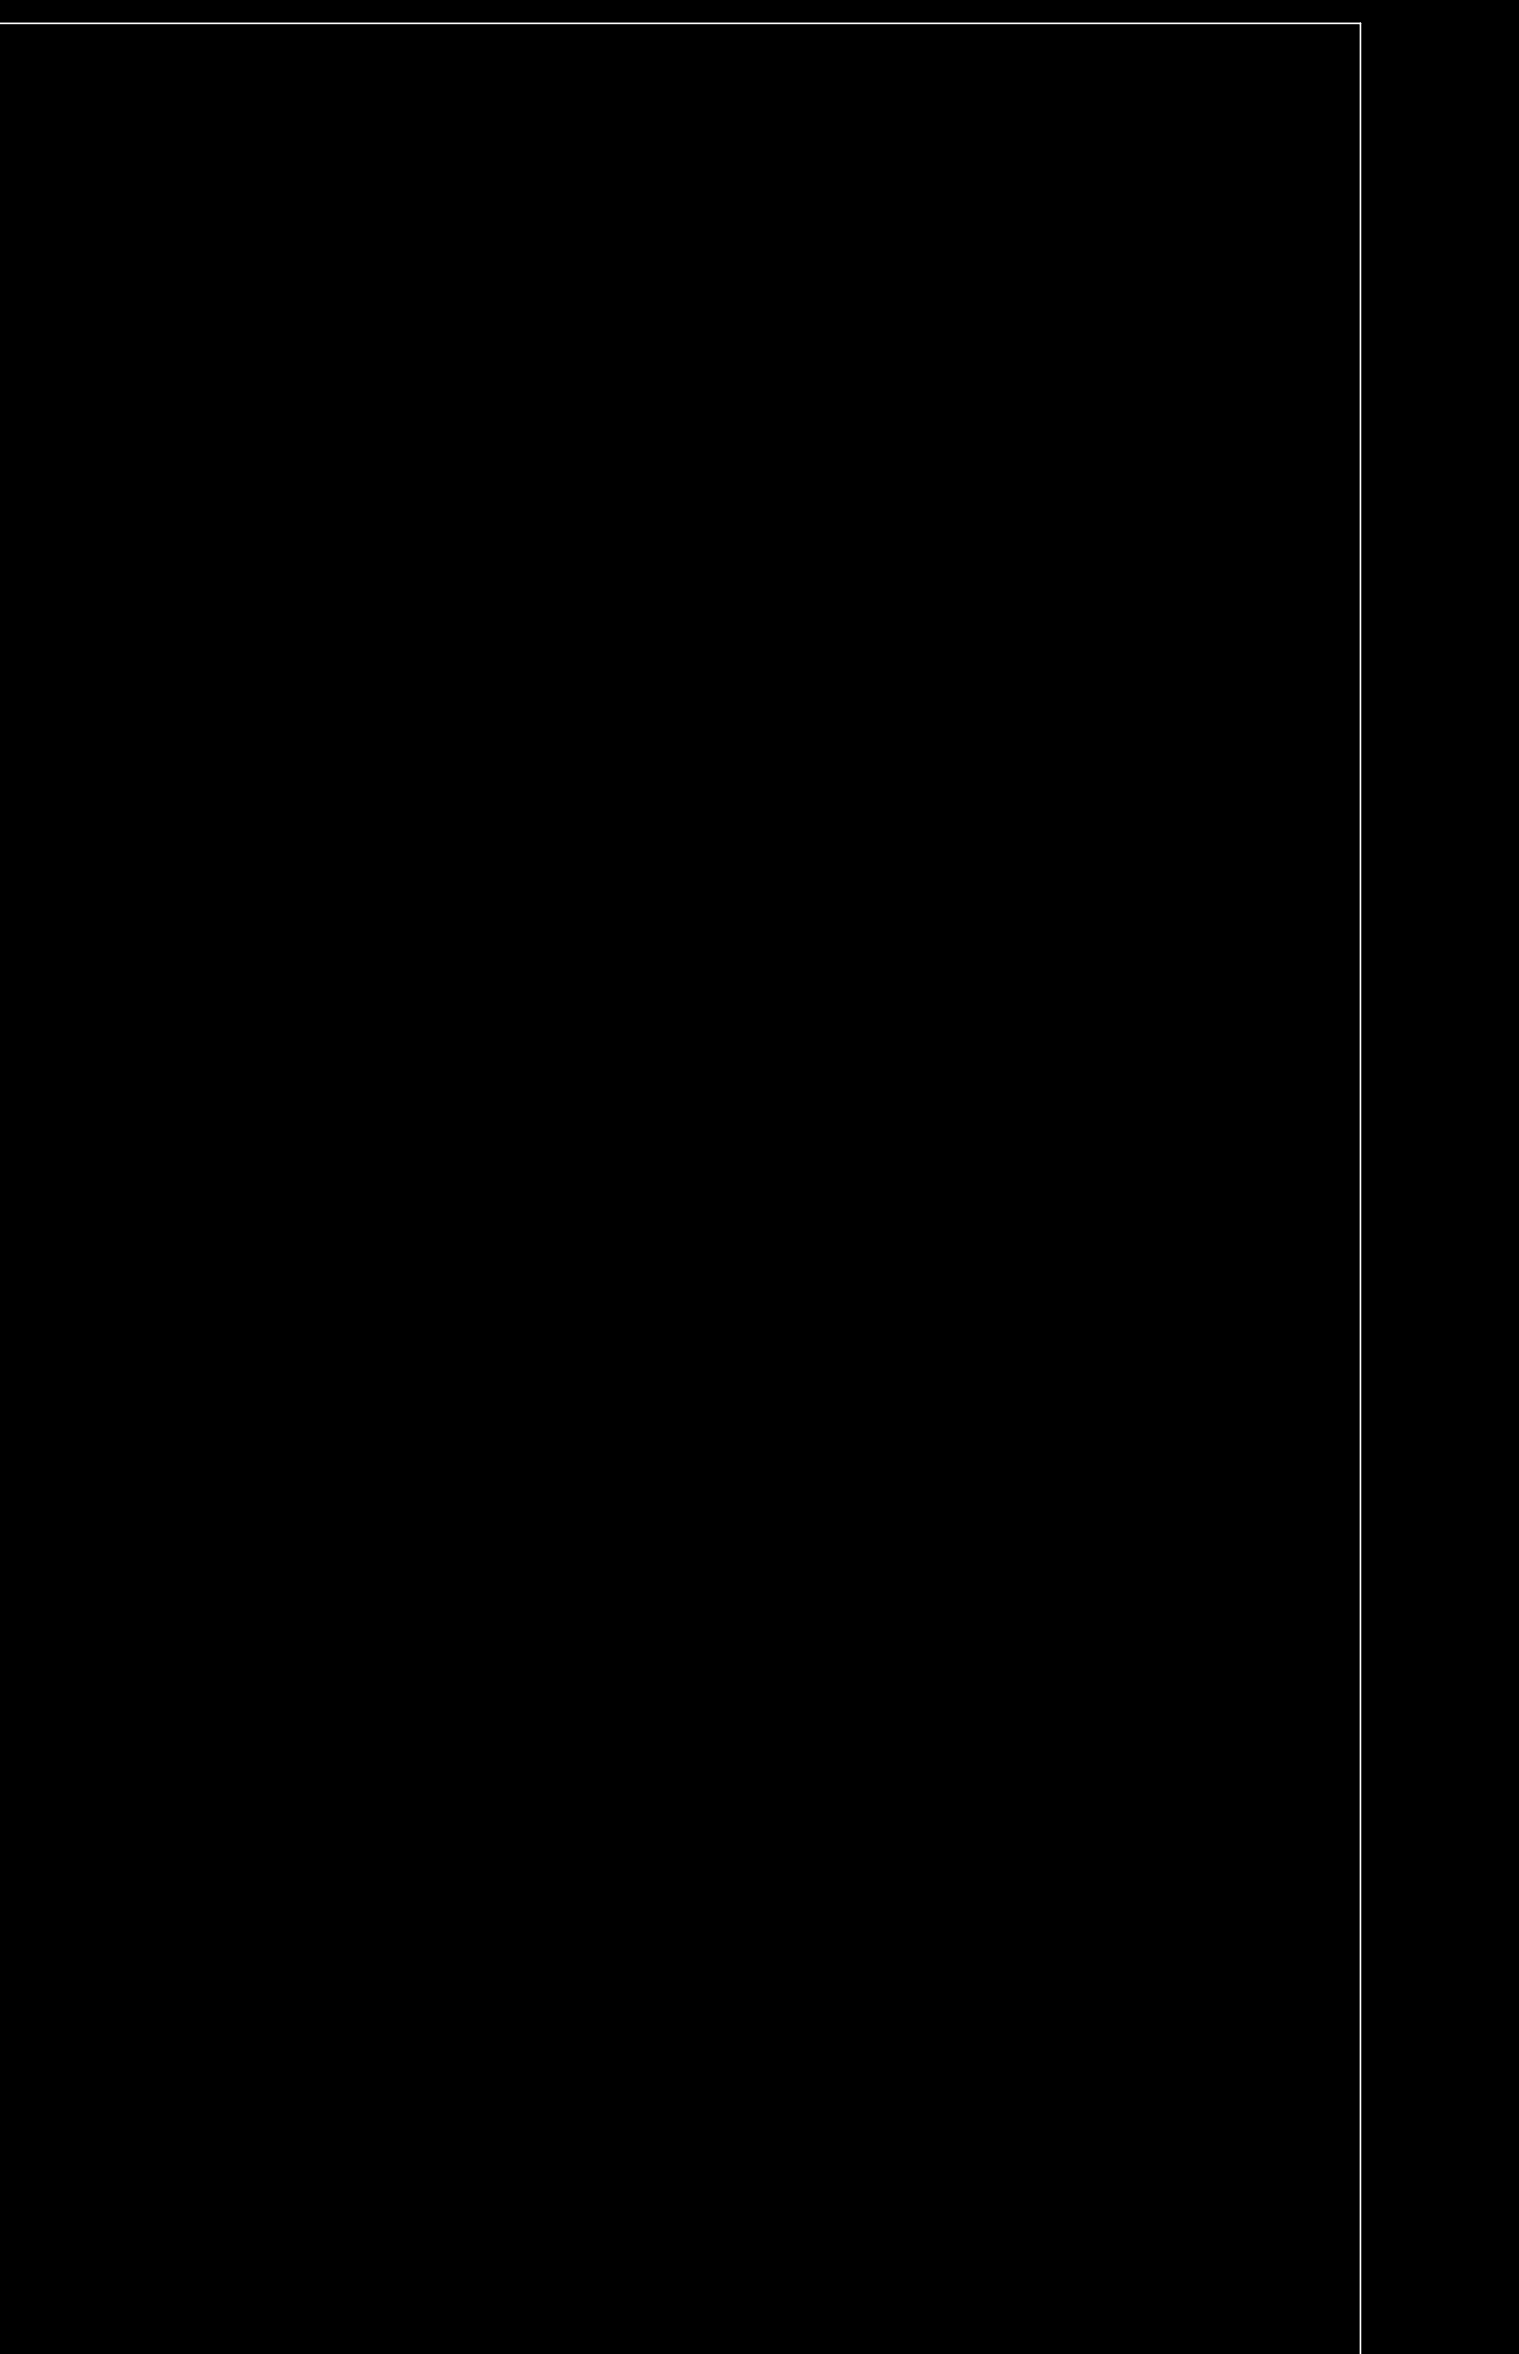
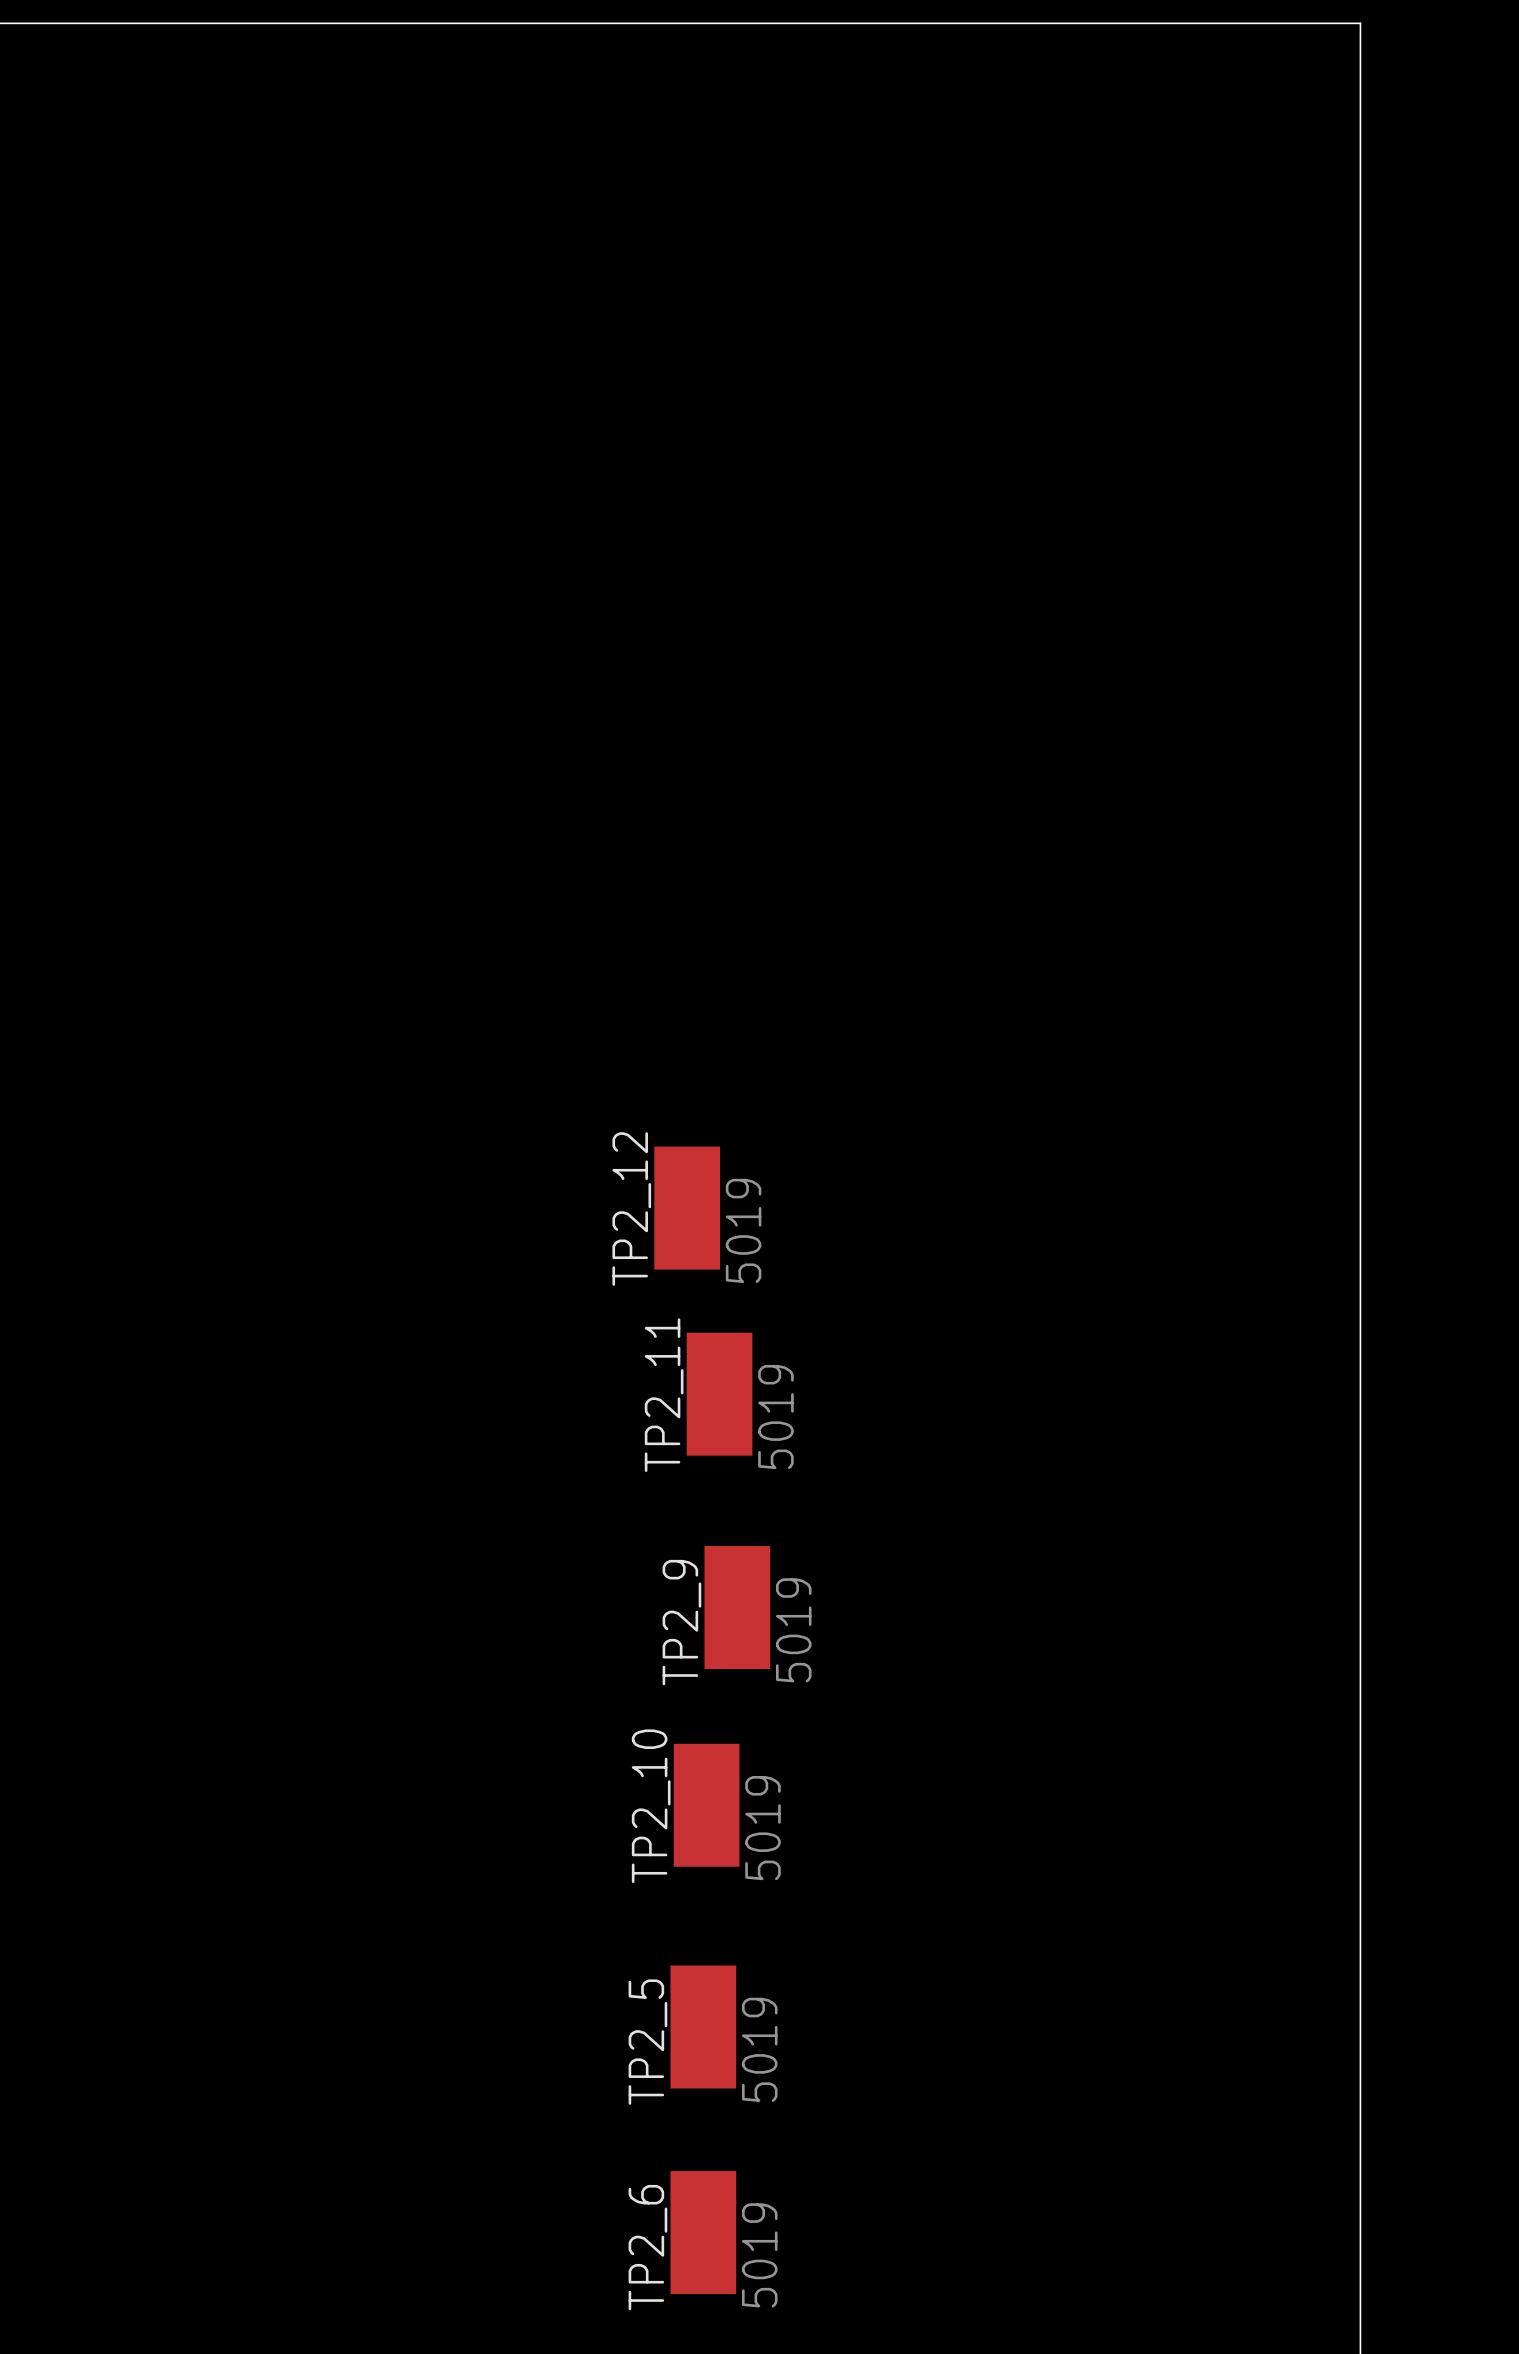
TP2_12: none -> 5019 (687, 1208)
TP2_11: none -> 5019 (719, 1394)
TP2_9: none -> 5019 (737, 1607)
TP2_10: none -> 5019 (706, 1805)
TP2_5: none -> 5019 (703, 2027)
TP2_6: none -> 5019 (703, 2232)

